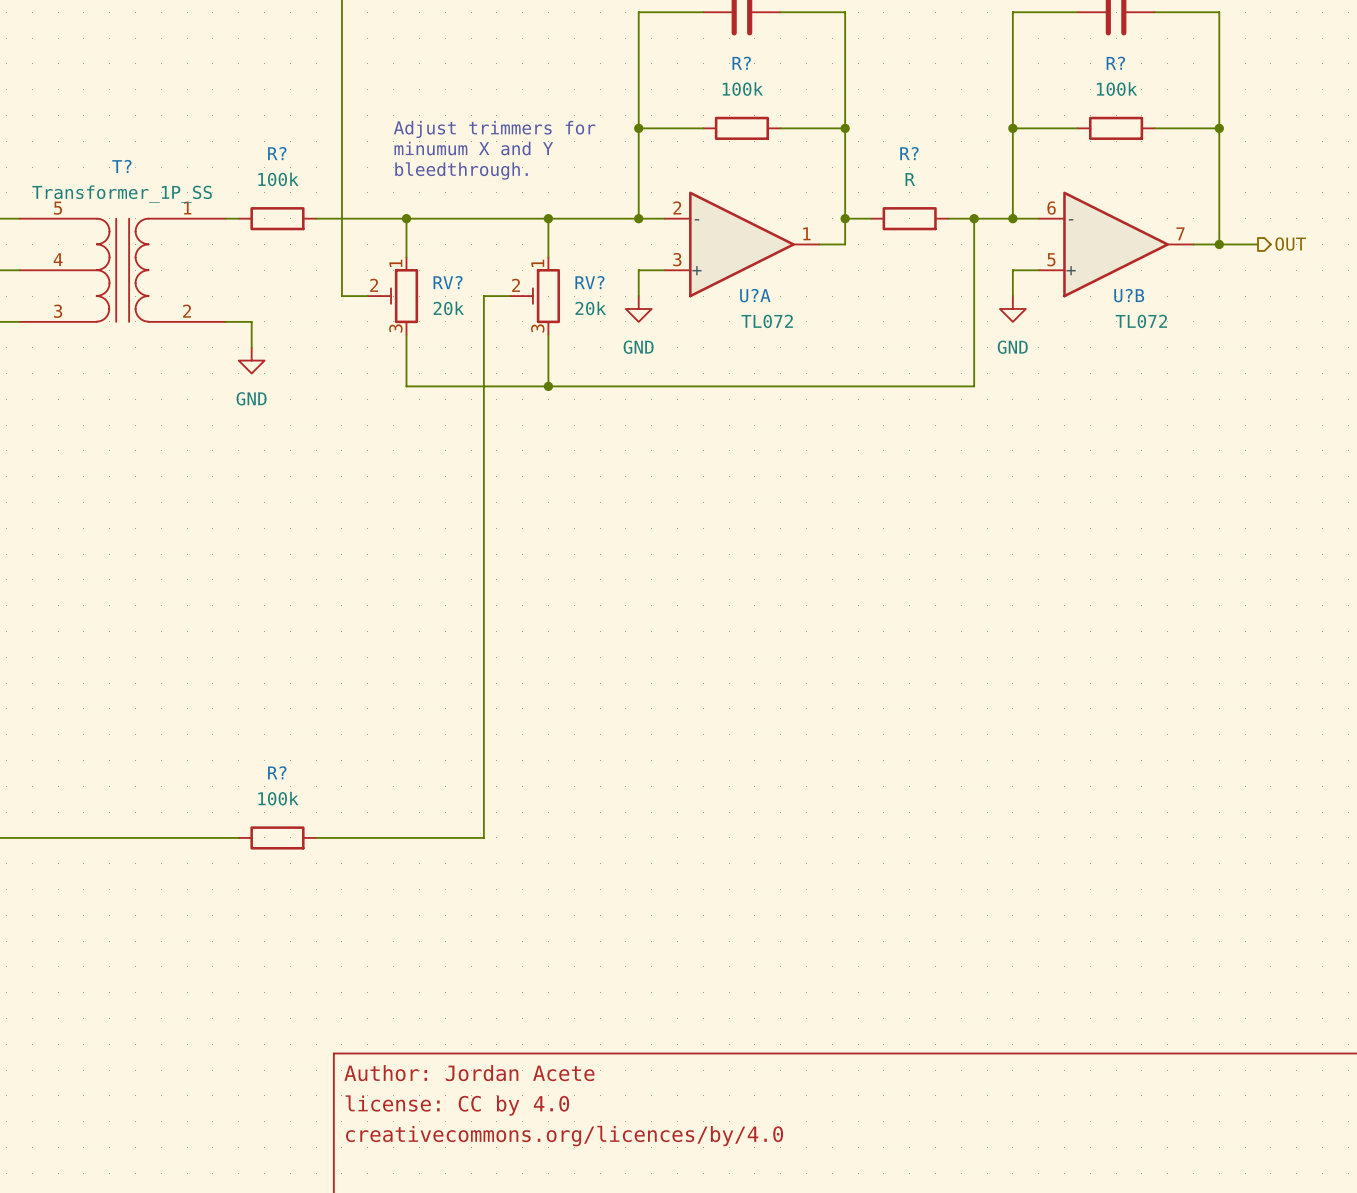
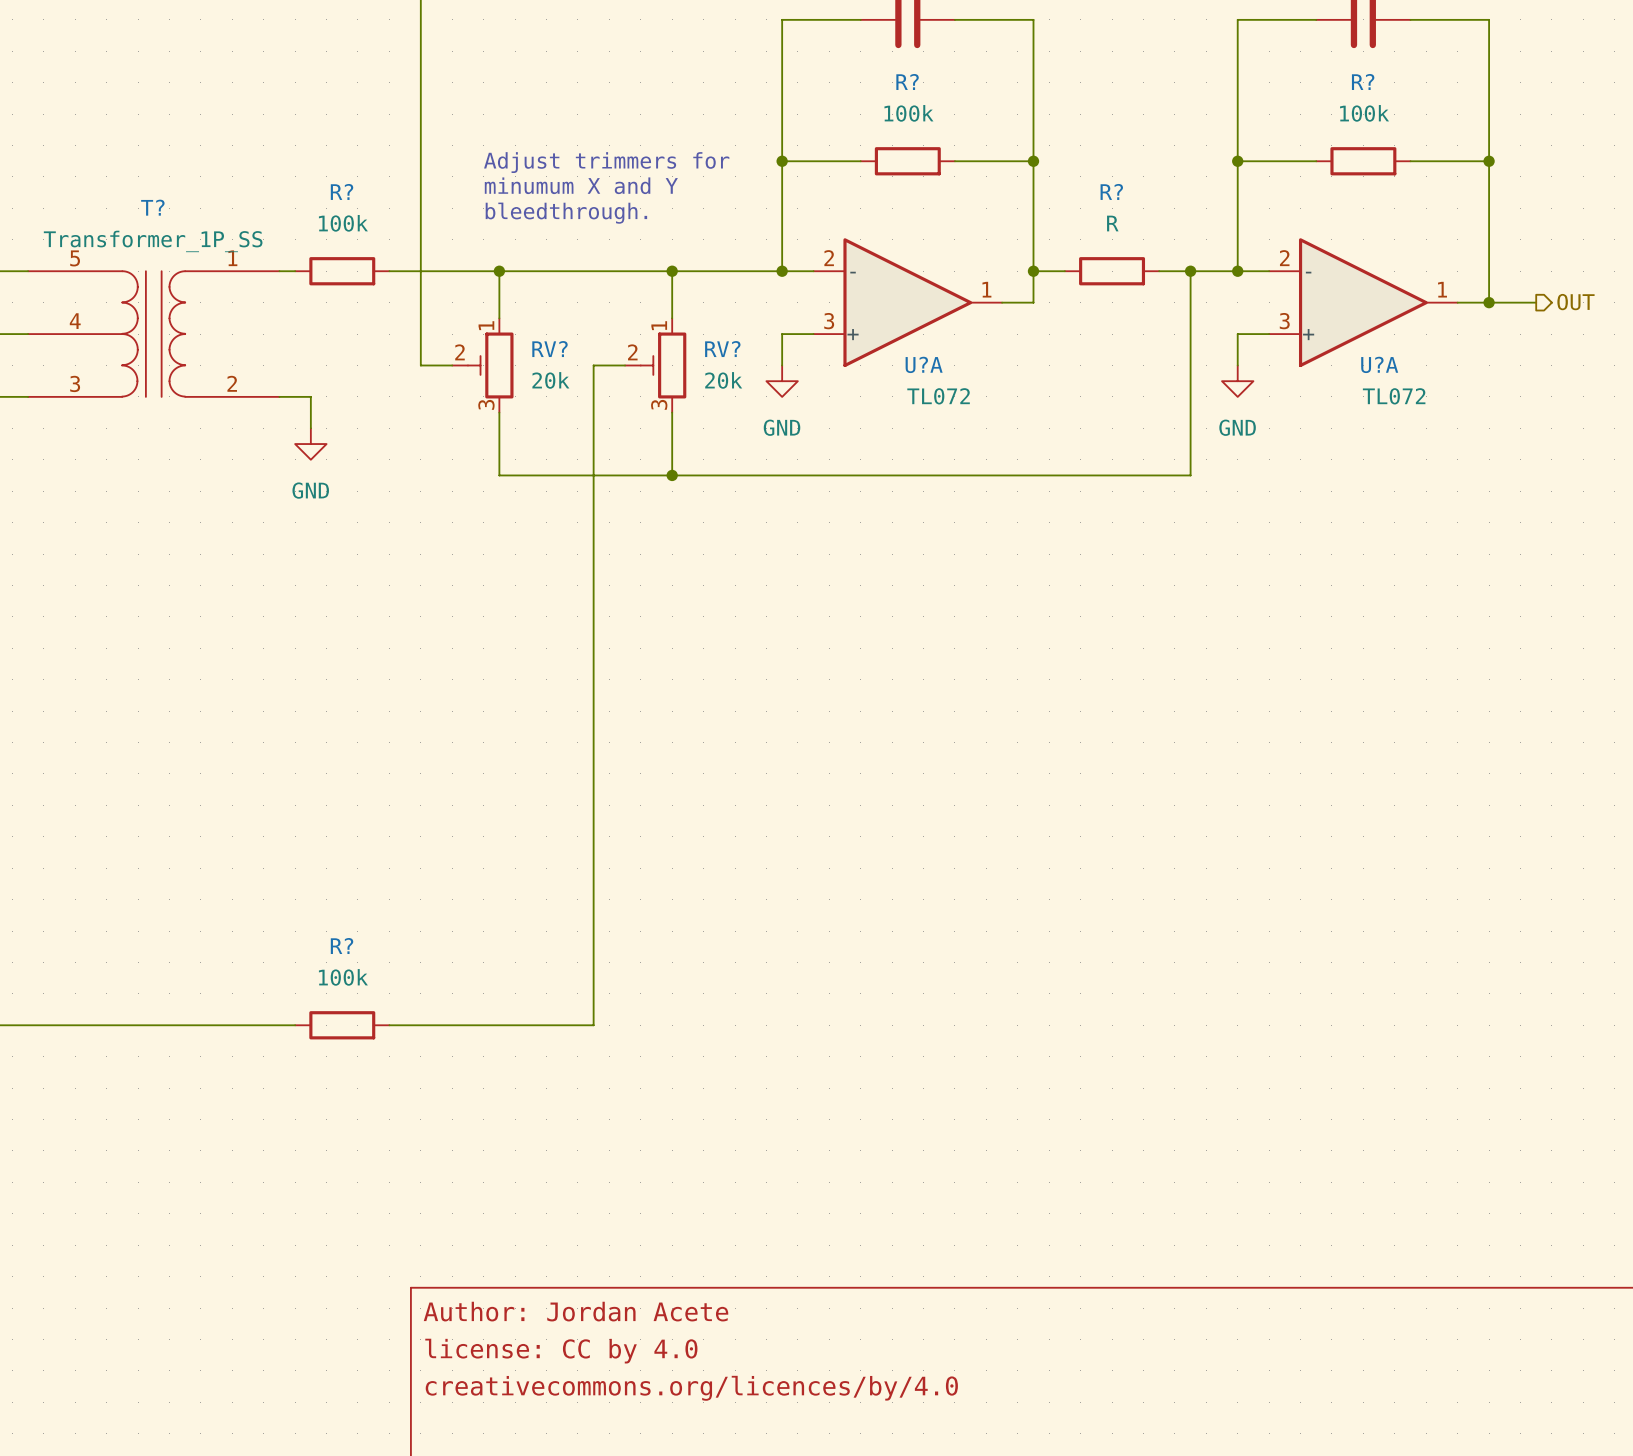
U?B pin number: 6 (1051, 208) -> 2 (1284, 258)
U?B pin number: 7 (1180, 233) -> 1 (1442, 289)
U?B pin number: 5 (1051, 259) -> 3 (1284, 321)
U?B name: U?B (1129, 295) -> U?A (1379, 364)

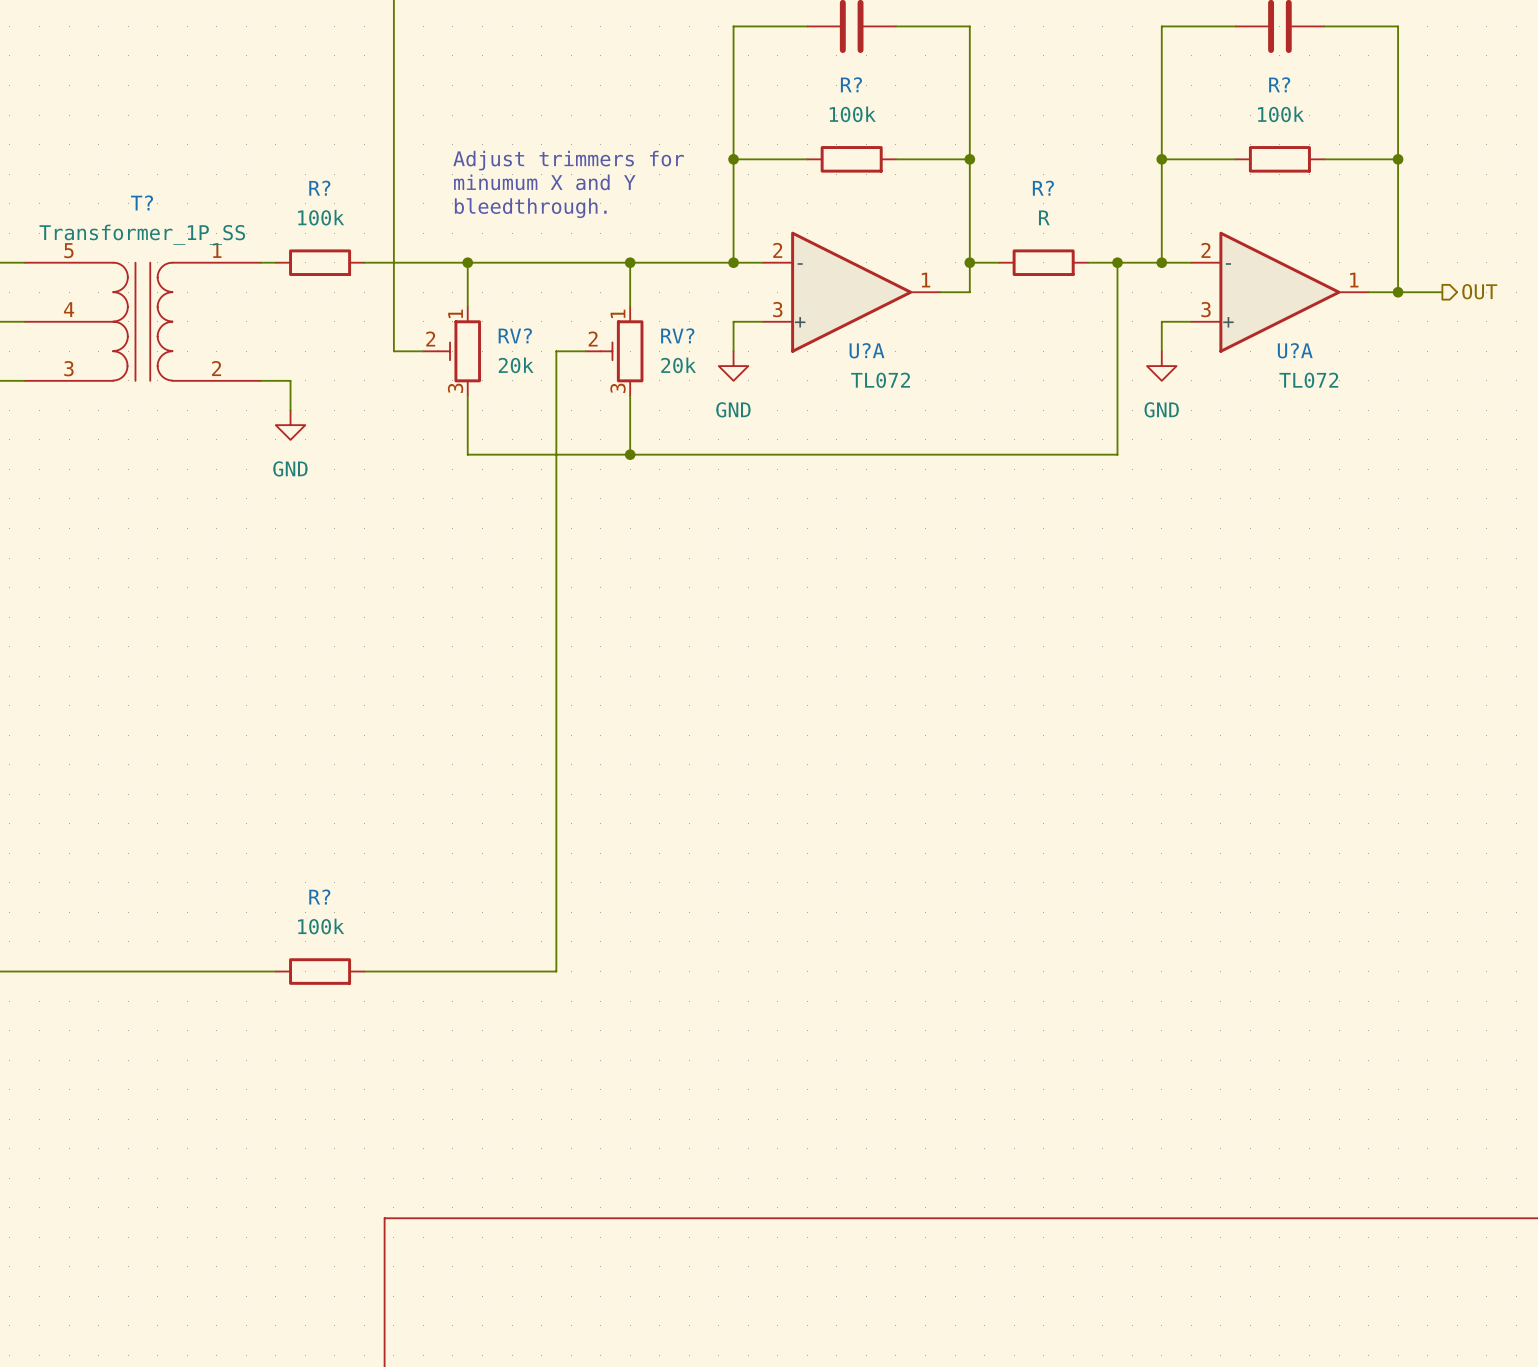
title block: Author: Jordan Acete (576, 1311) -> none
title block: license: CC by 4.0 (561, 1351) -> none
title block: creativecommons.org/licences/by/4.0 (691, 1388) -> none

